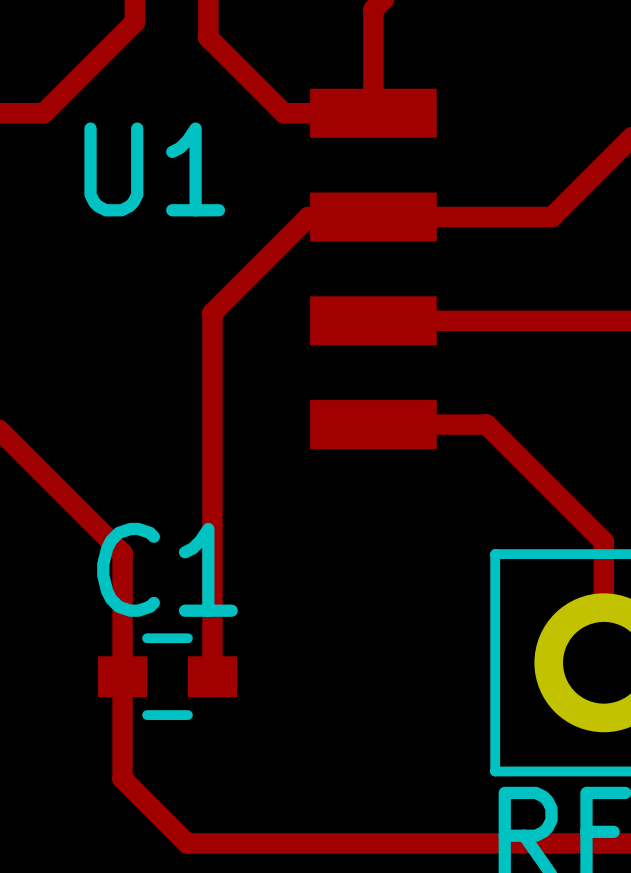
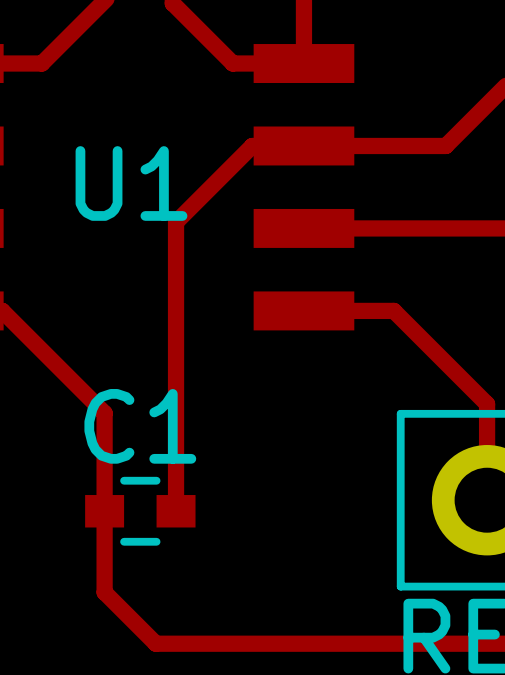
U1 name position: U1 (154, 169) -> U1 (131, 183)

